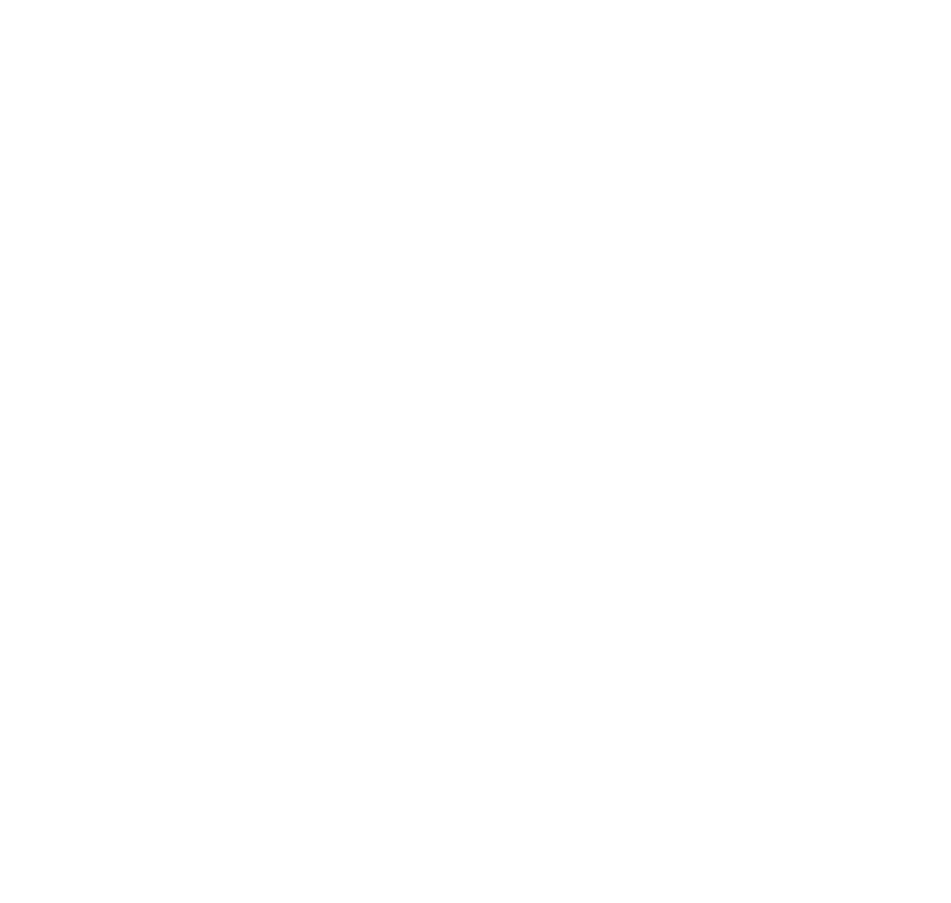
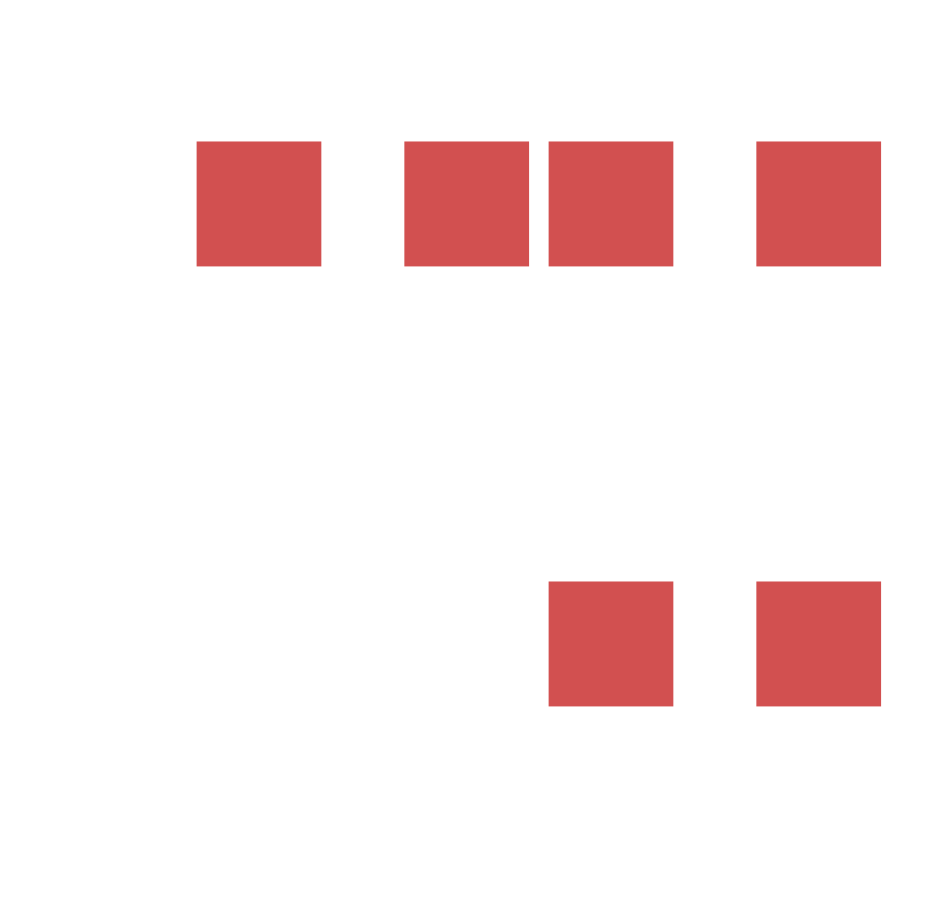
part: none -> (362, 203)
part: none -> (714, 203)
part: none -> (714, 643)

